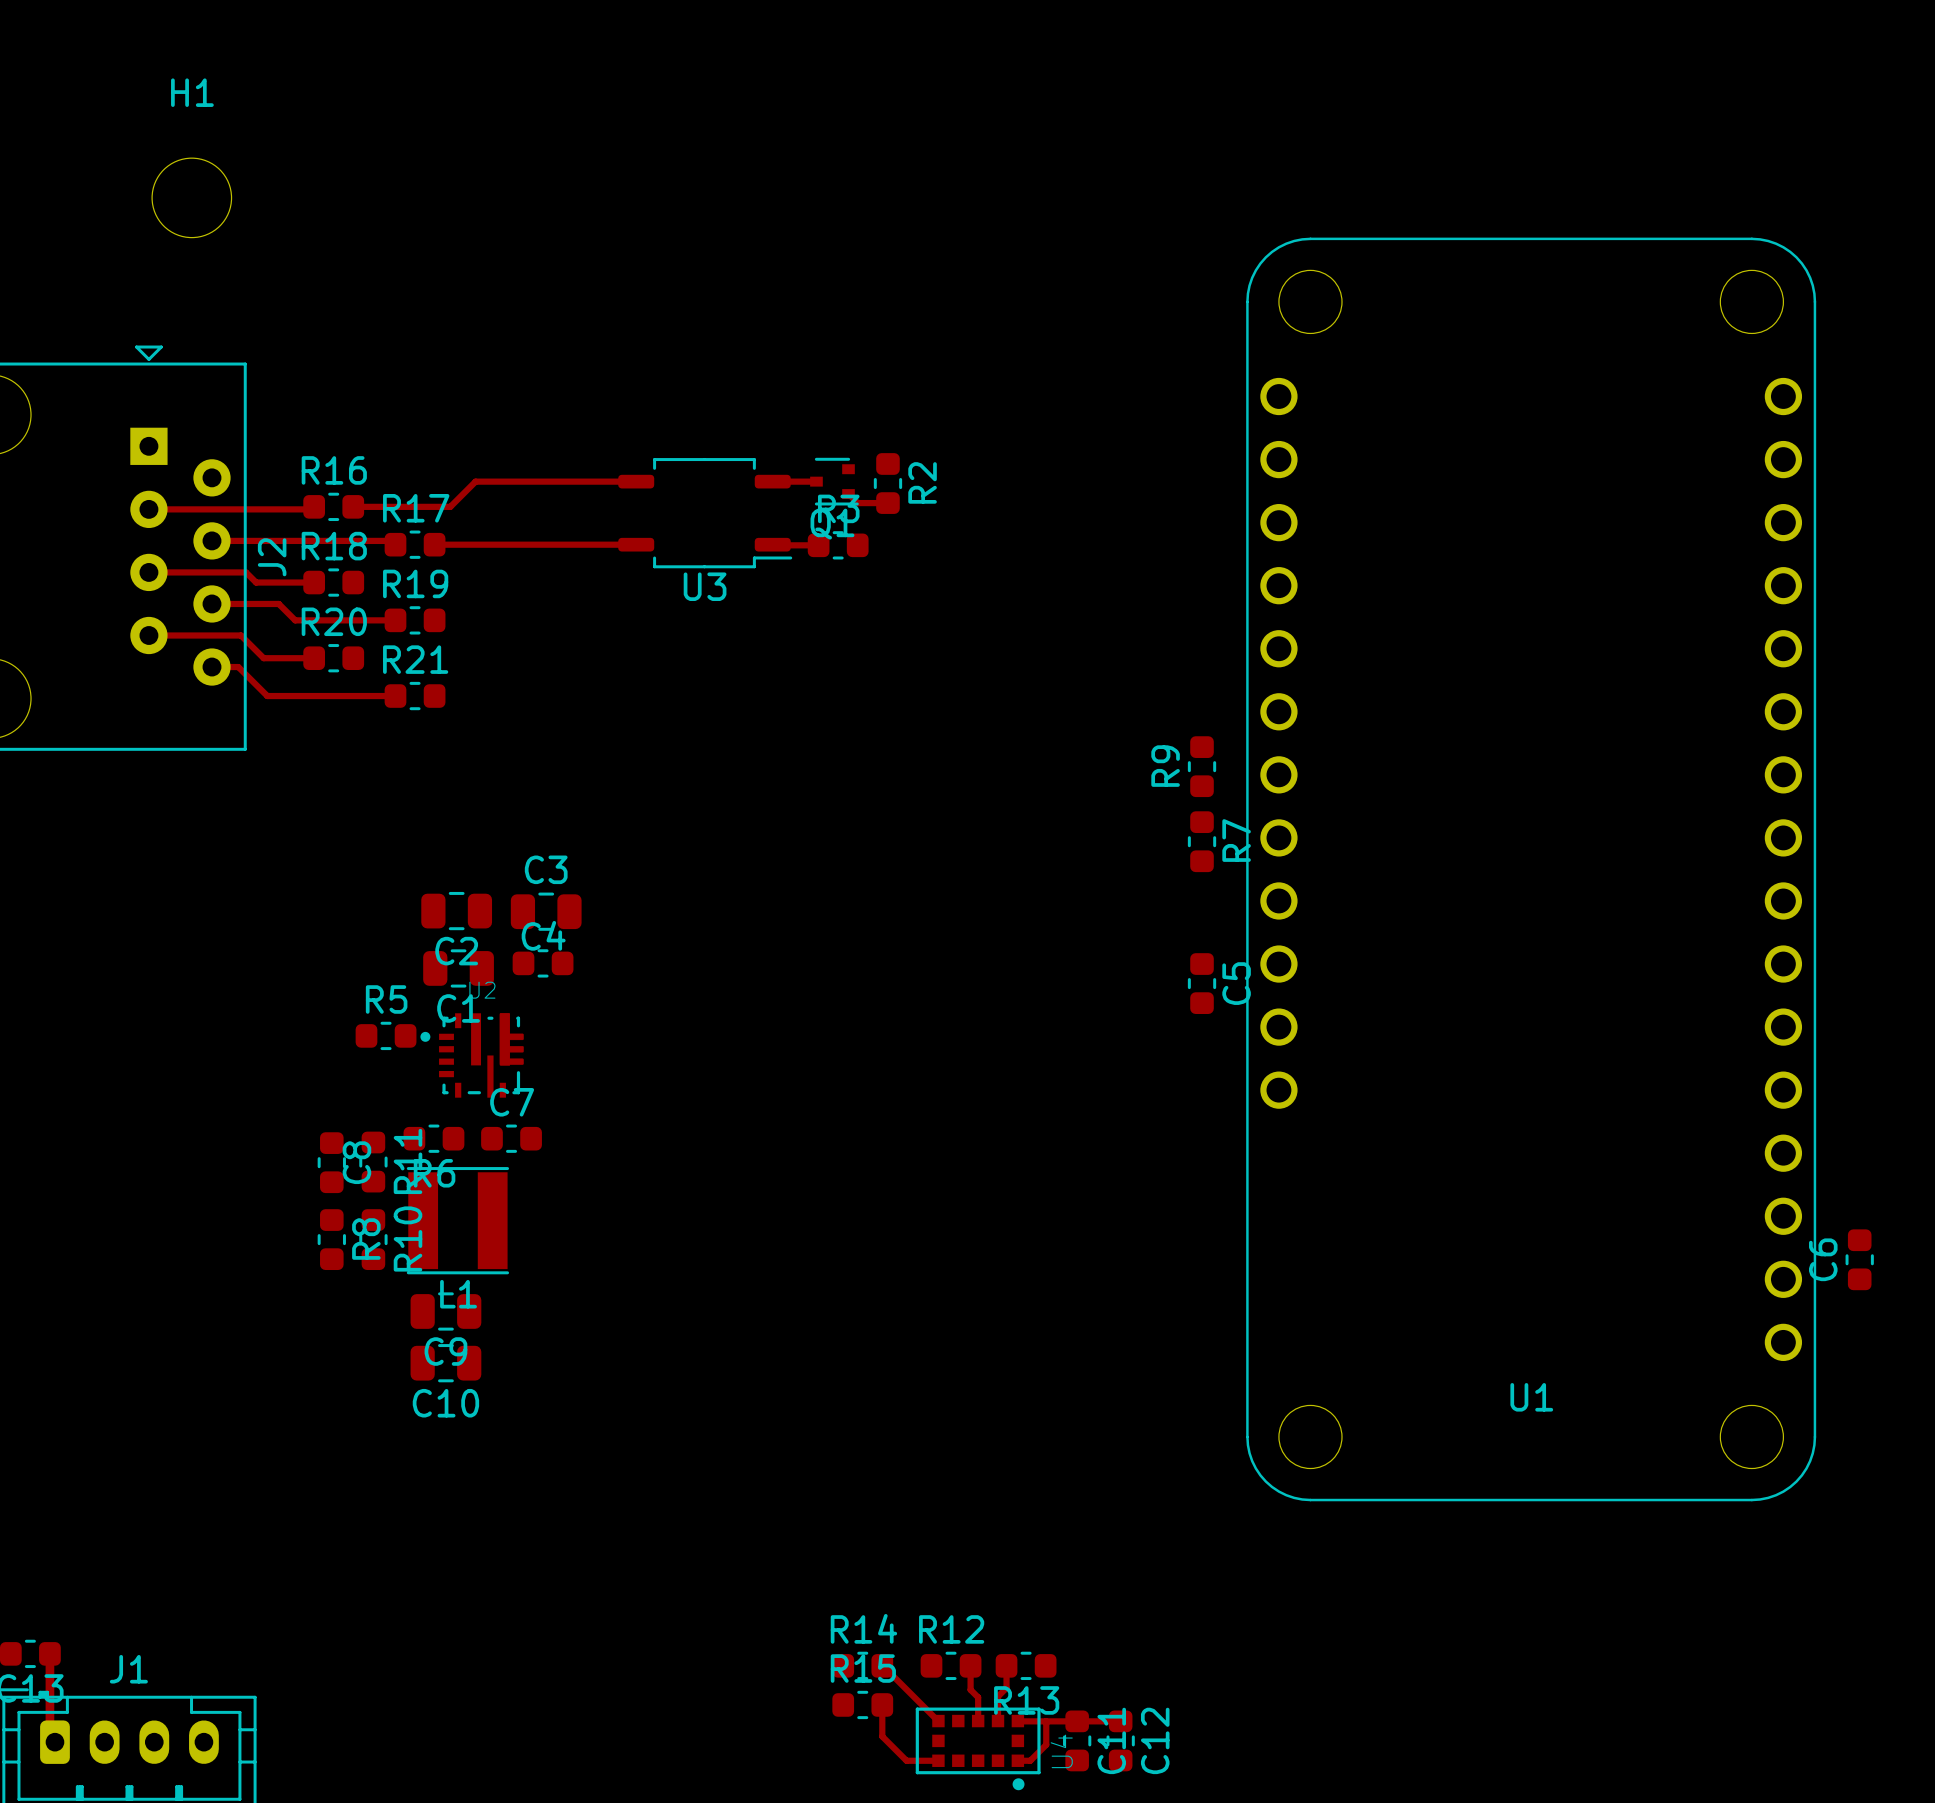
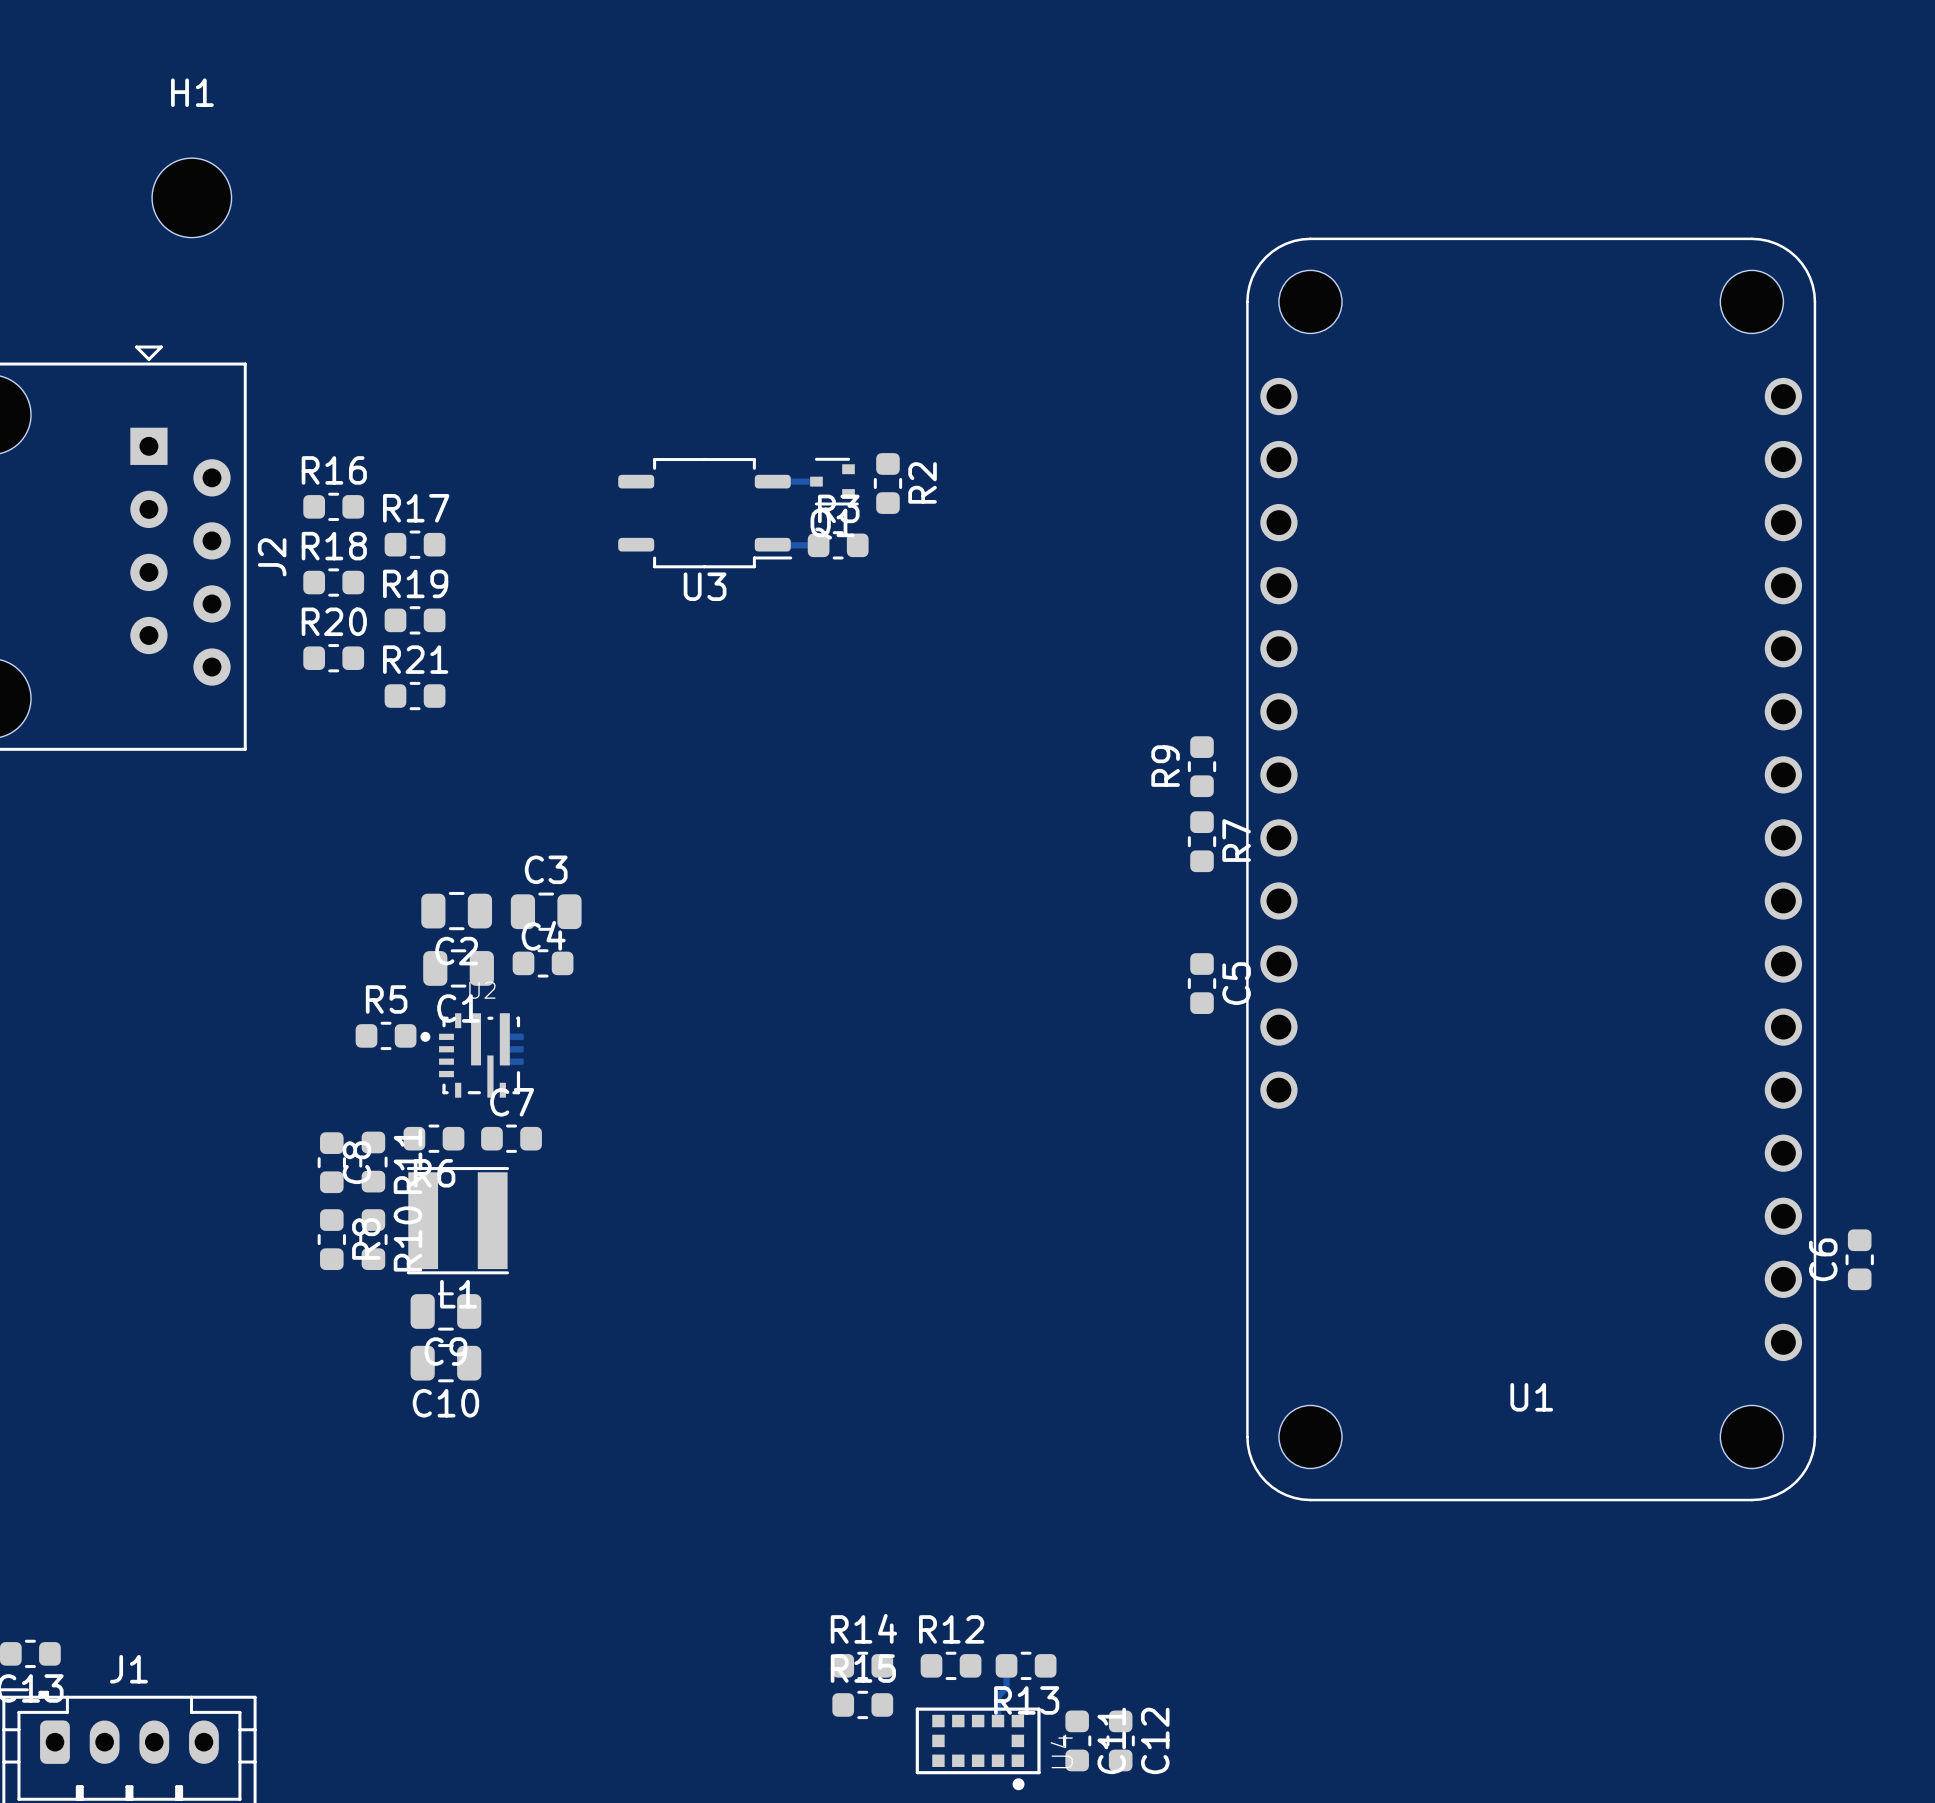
track: (636, 481) (475, 481) (450, 506) (353, 506) -> none
track: (848, 494) (857, 503) (887, 503) -> none
track: (314, 506) (311, 509) (148, 509) -> none
track: (211, 540) (391, 540) (395, 544) -> none
track: (434, 544) (636, 544) -> none
track: (148, 572) (246, 572) (256, 582) (314, 582) -> none
track: (211, 603) (278, 603) (295, 620) (395, 620) -> none
track: (148, 635) (241, 635) (263, 658) (314, 658) -> none
track: (211, 667) (238, 667) (267, 696) (395, 696) -> none
track: (49, 1653) (49, 1737) (54, 1742) -> none
track: (882, 1665) (938, 1721) -> none
track: (970, 1665) (970, 1689) (978, 1697) (978, 1721) -> none
track: (882, 1704) (882, 1736) (906, 1760) (938, 1760) -> none
track: (1018, 1721) (1046, 1721) -> none
track: (1046, 1721) (1046, 1744) (1030, 1760) (1017, 1760) -> none
track: (1046, 1721) (1120, 1721) -> none

